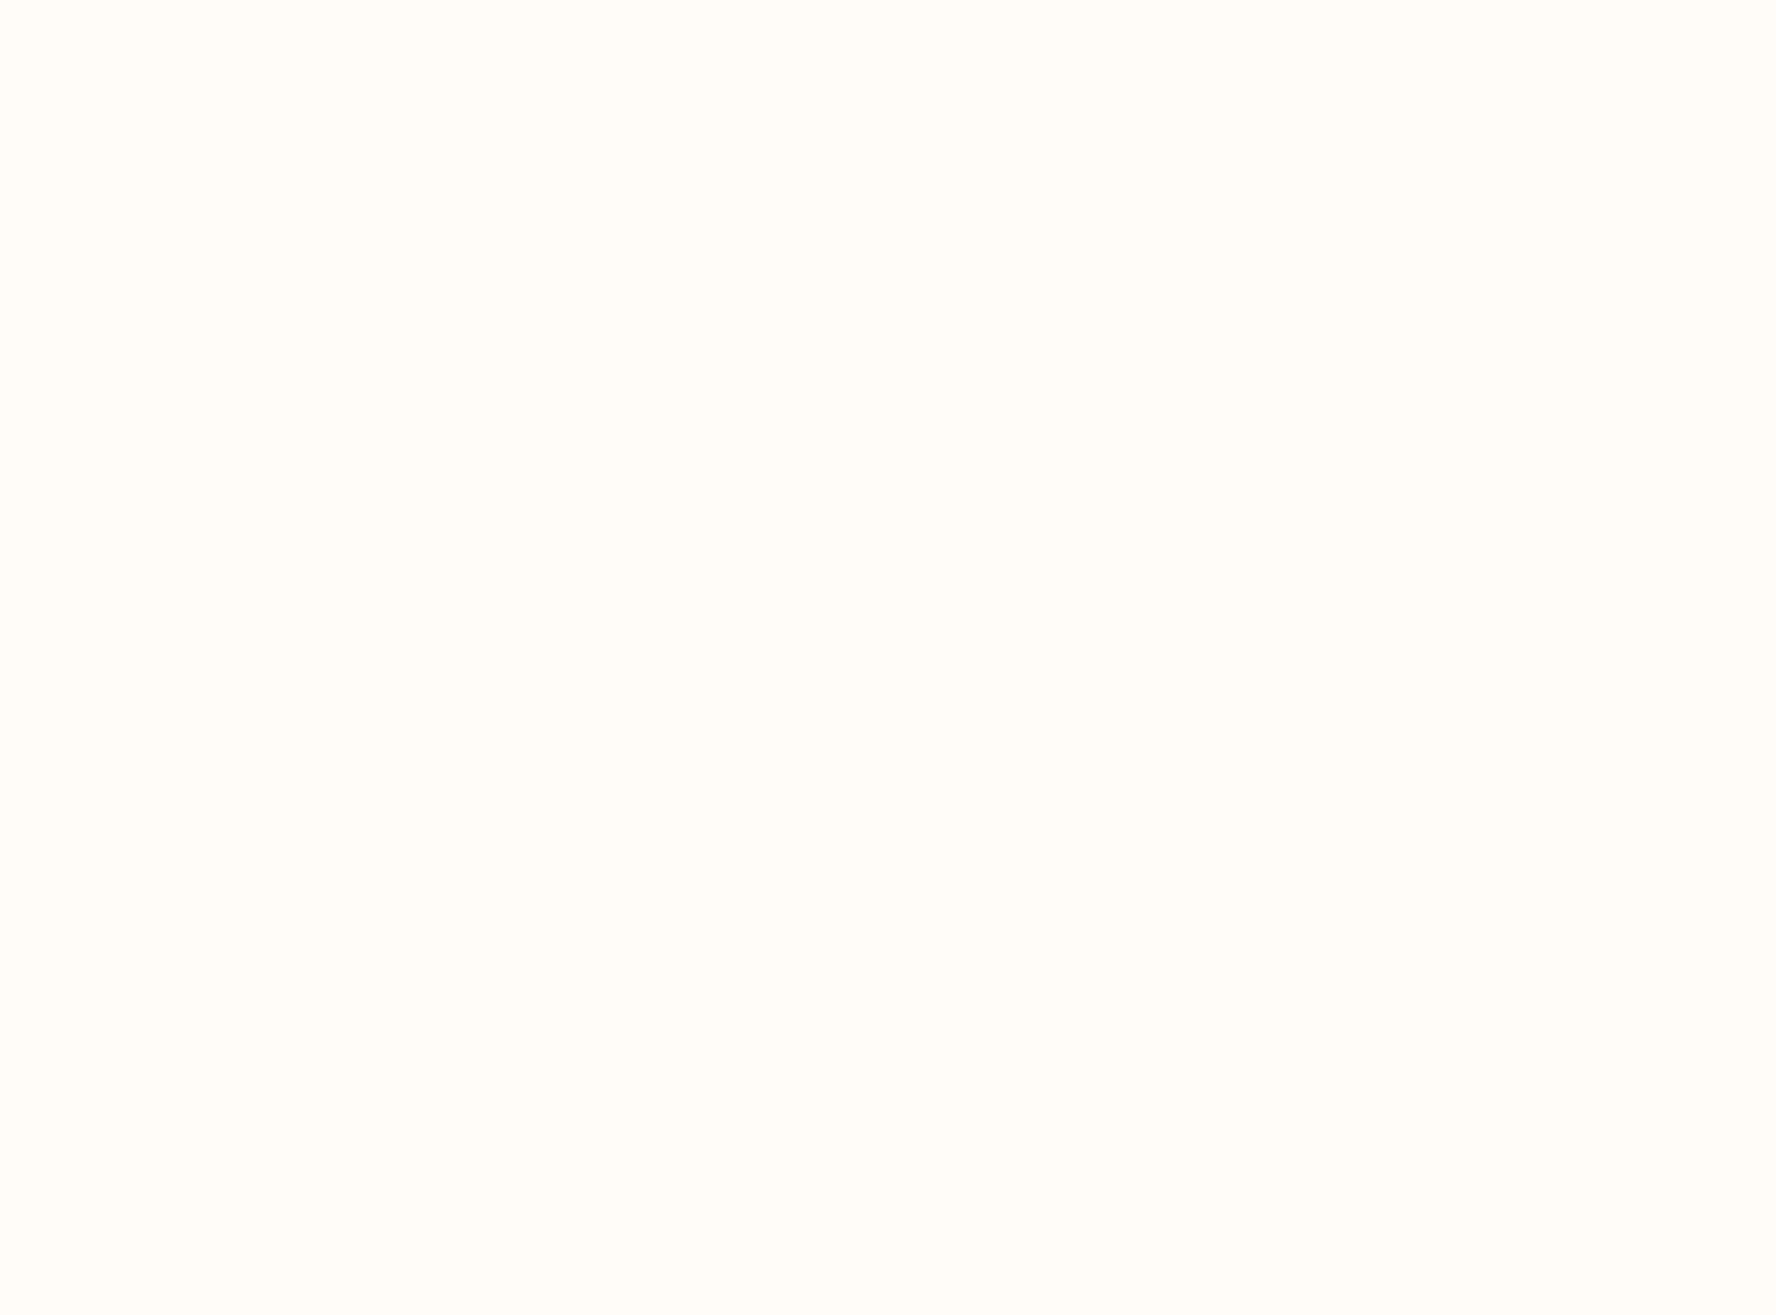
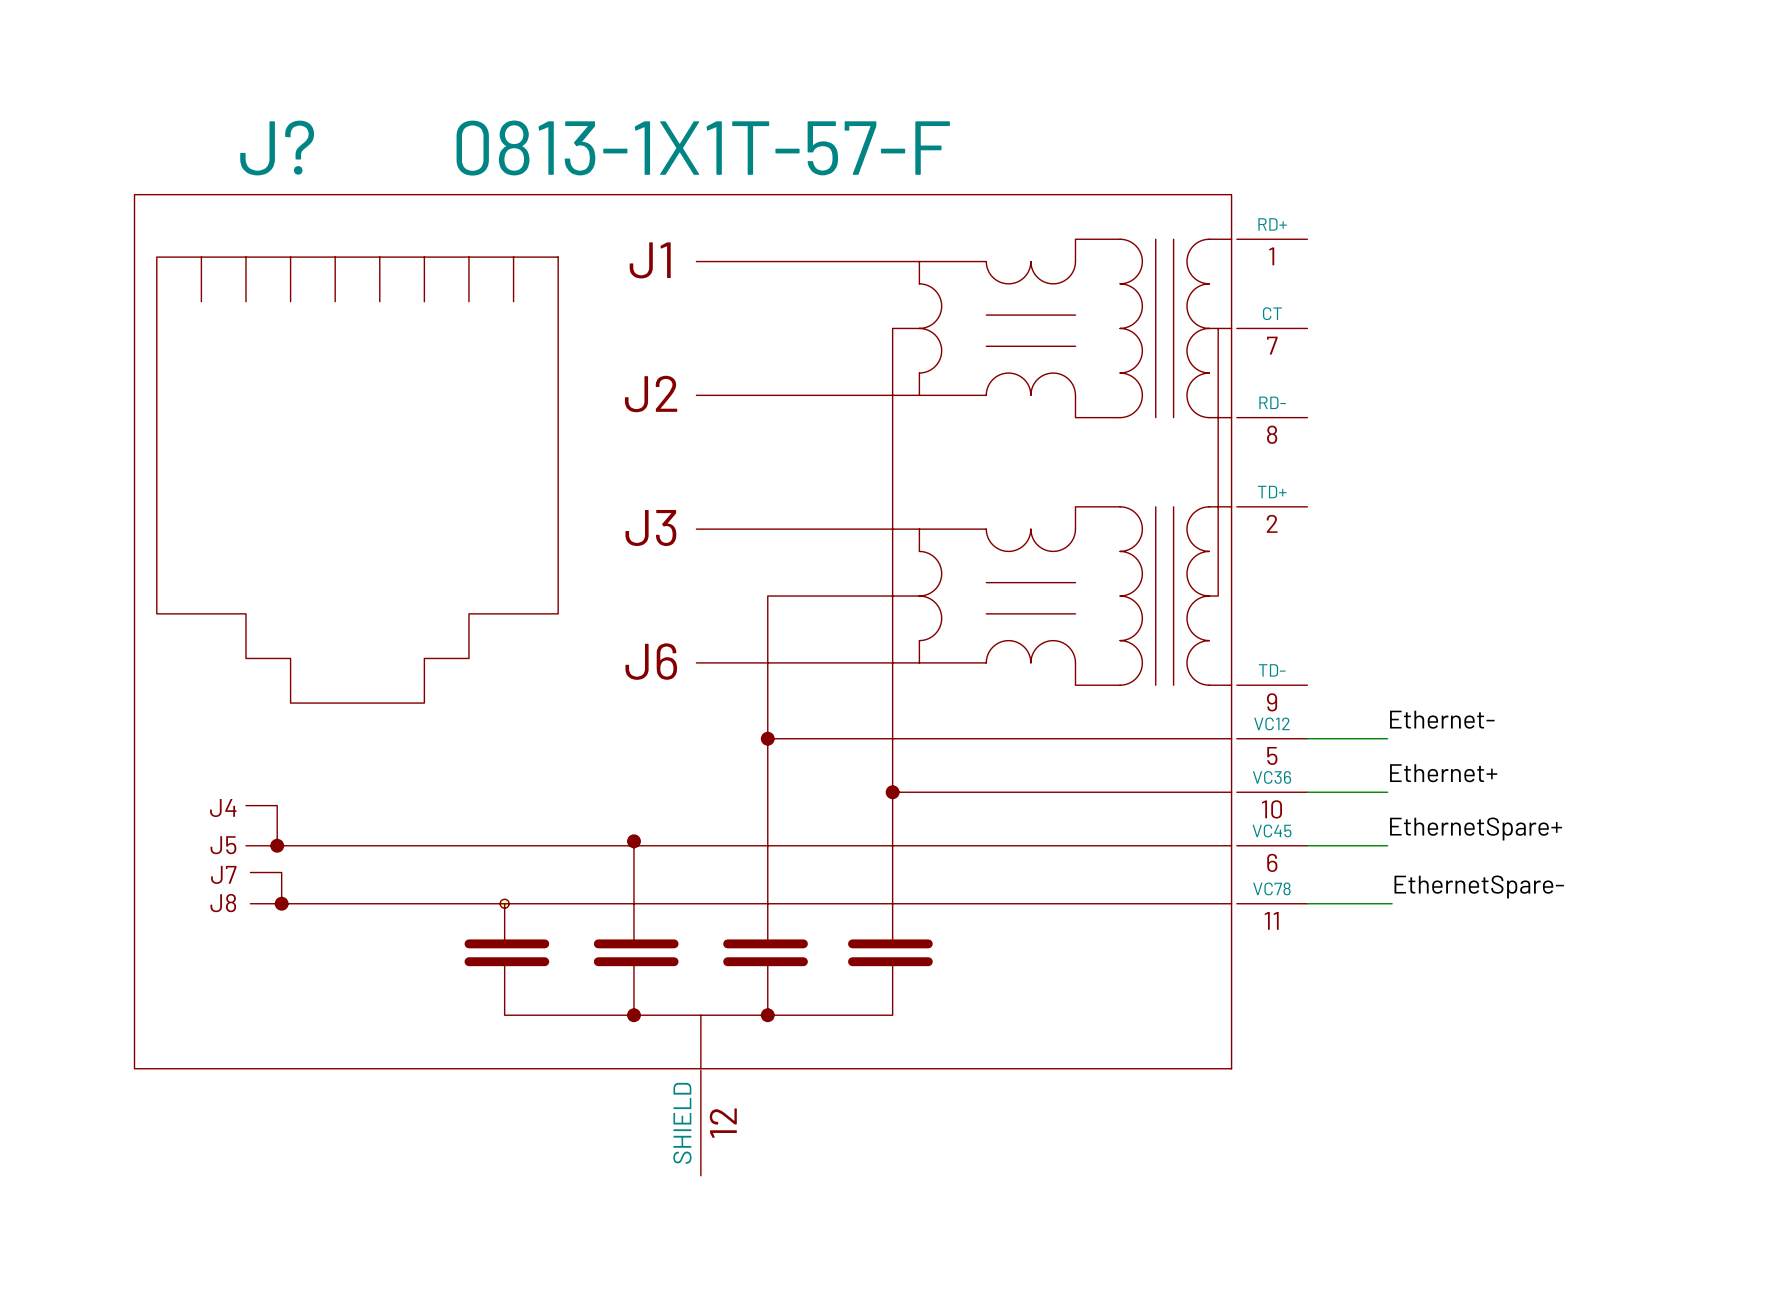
J?: none -> 0813-1X1T-57-F (720, 685)
label: none -> Ethernet- (1442, 719)
wire: none -> (1307, 738) (1387, 738)
label: none -> Ethernet+ (1443, 773)
wire: none -> (1307, 792) (1387, 792)
label: none -> EthernetSpare+ (1476, 829)
wire: none -> (1307, 845) (1387, 845)
label: none -> EthernetSpare- (1479, 886)
wire: none -> (1307, 903) (1392, 903)

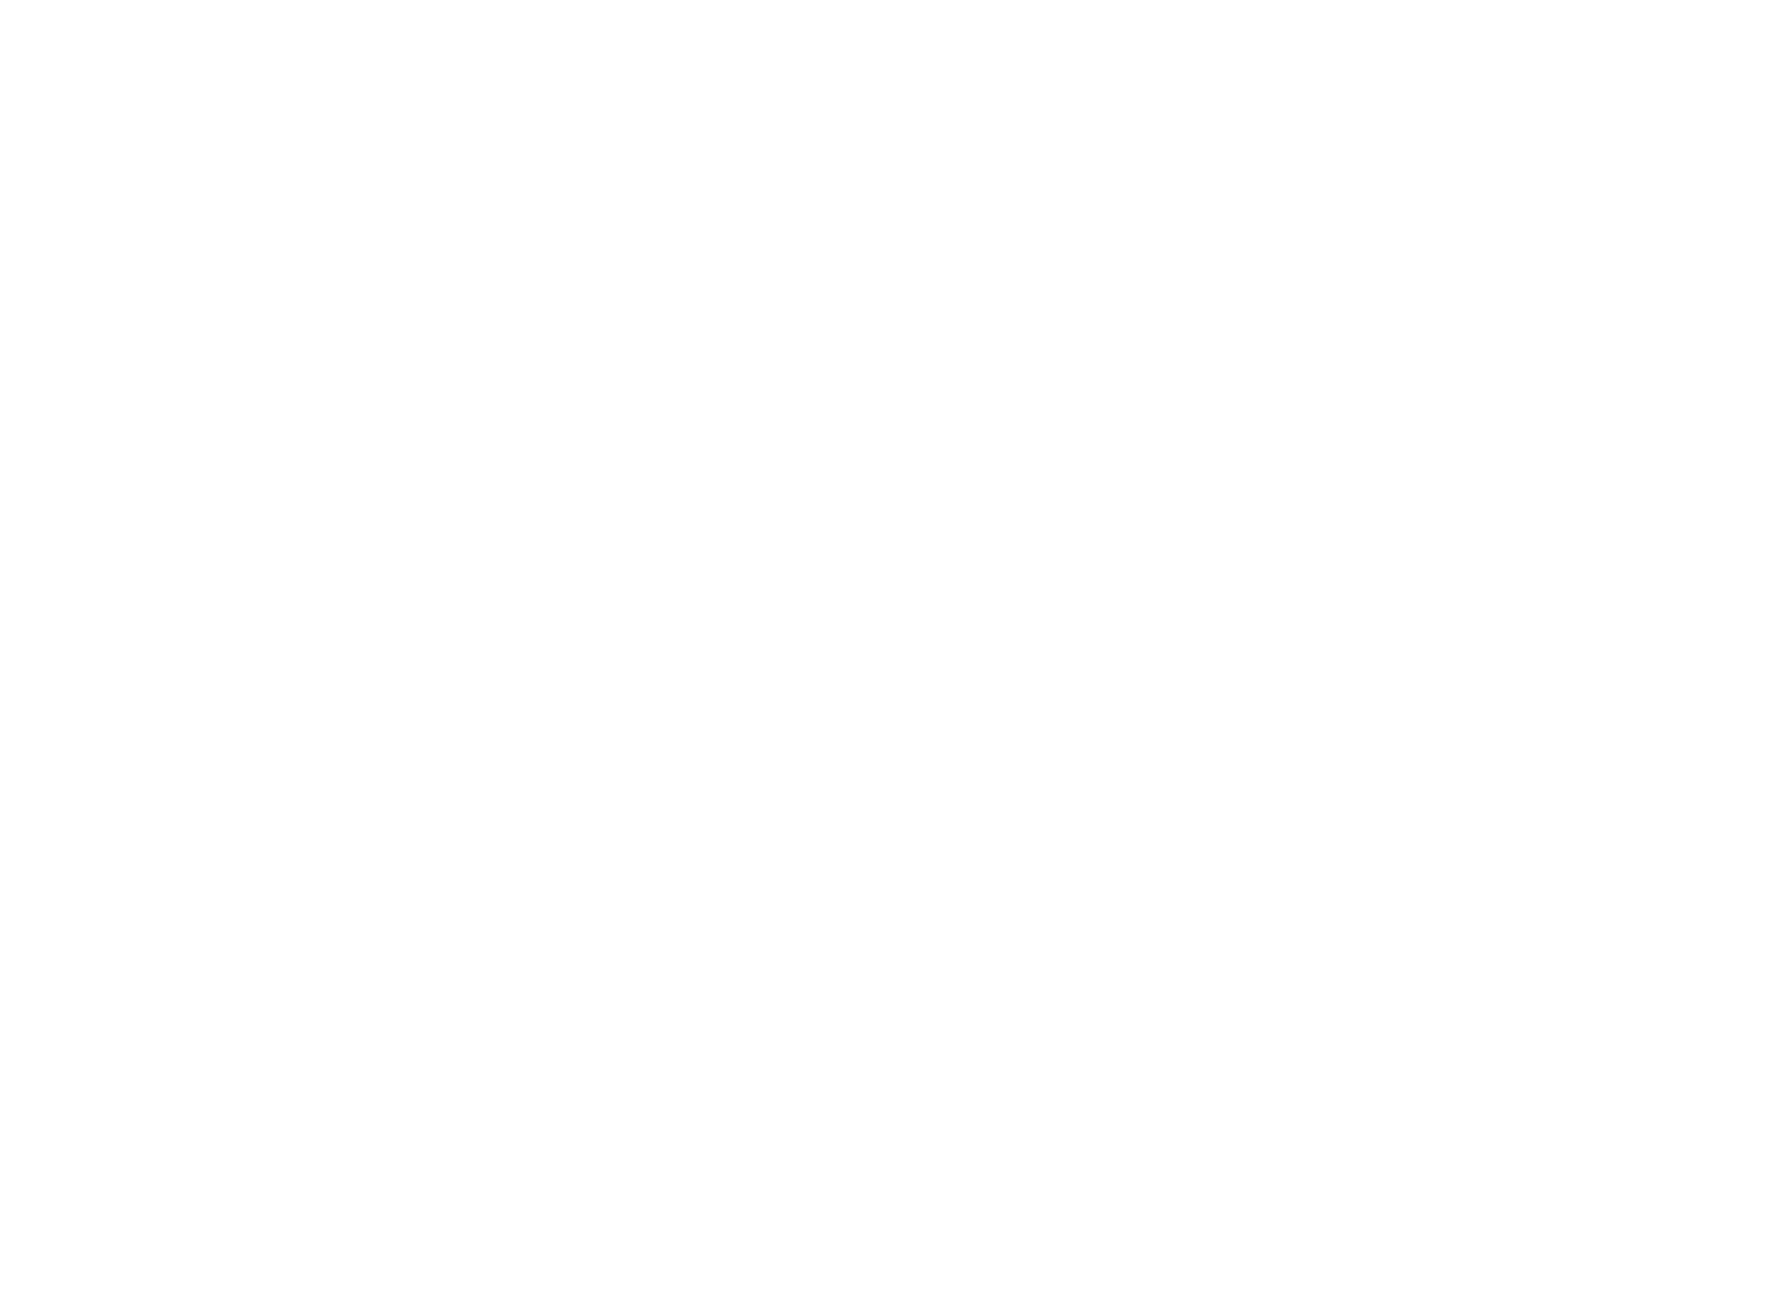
J?: 0813-1X1T-57-F (720, 685) -> none
label: Ethernet- (1442, 719) -> none
wire: (1307, 738) (1387, 738) -> none
label: Ethernet+ (1443, 773) -> none
wire: (1307, 792) (1387, 792) -> none
label: EthernetSpare+ (1476, 829) -> none
wire: (1307, 845) (1387, 845) -> none
label: EthernetSpare- (1479, 886) -> none
wire: (1307, 903) (1392, 903) -> none

